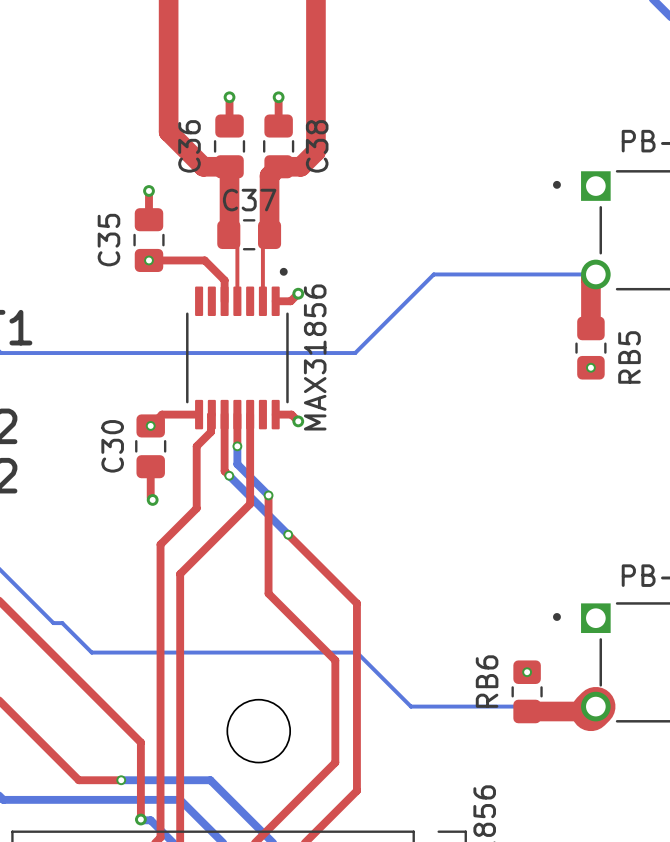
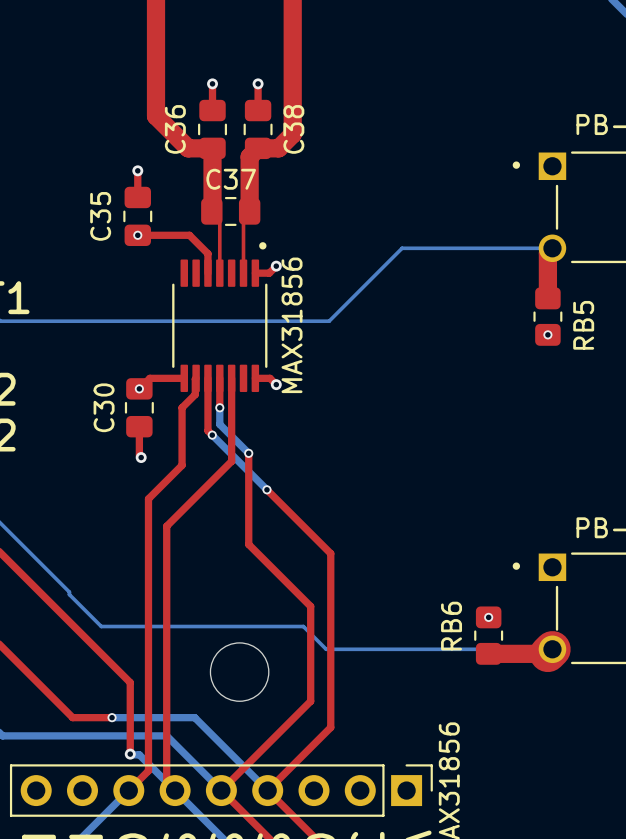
bottom track: (53, 623) (62, 623) (91, 652) (356, 652) (410, 706) -> (49, 571) (101, 626) (303, 626) (326, 649) (380, 649)

